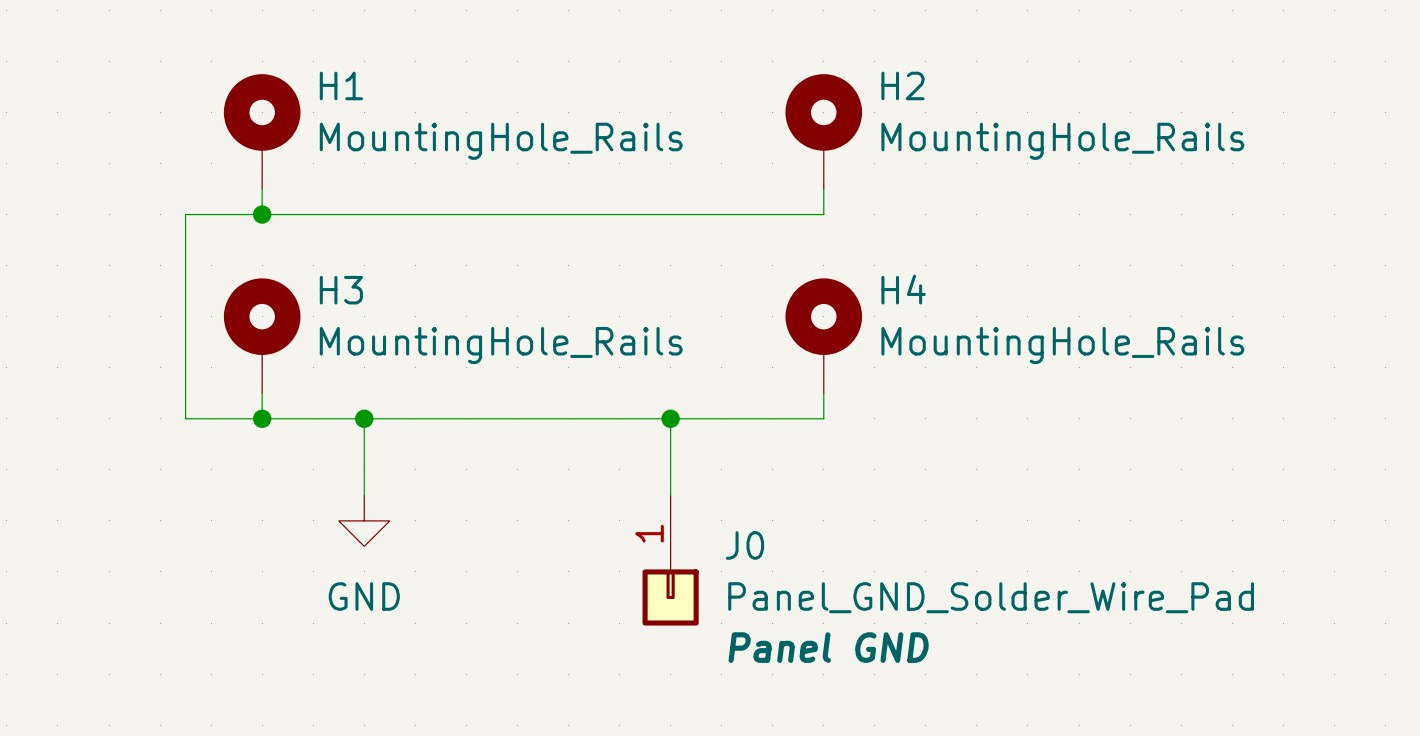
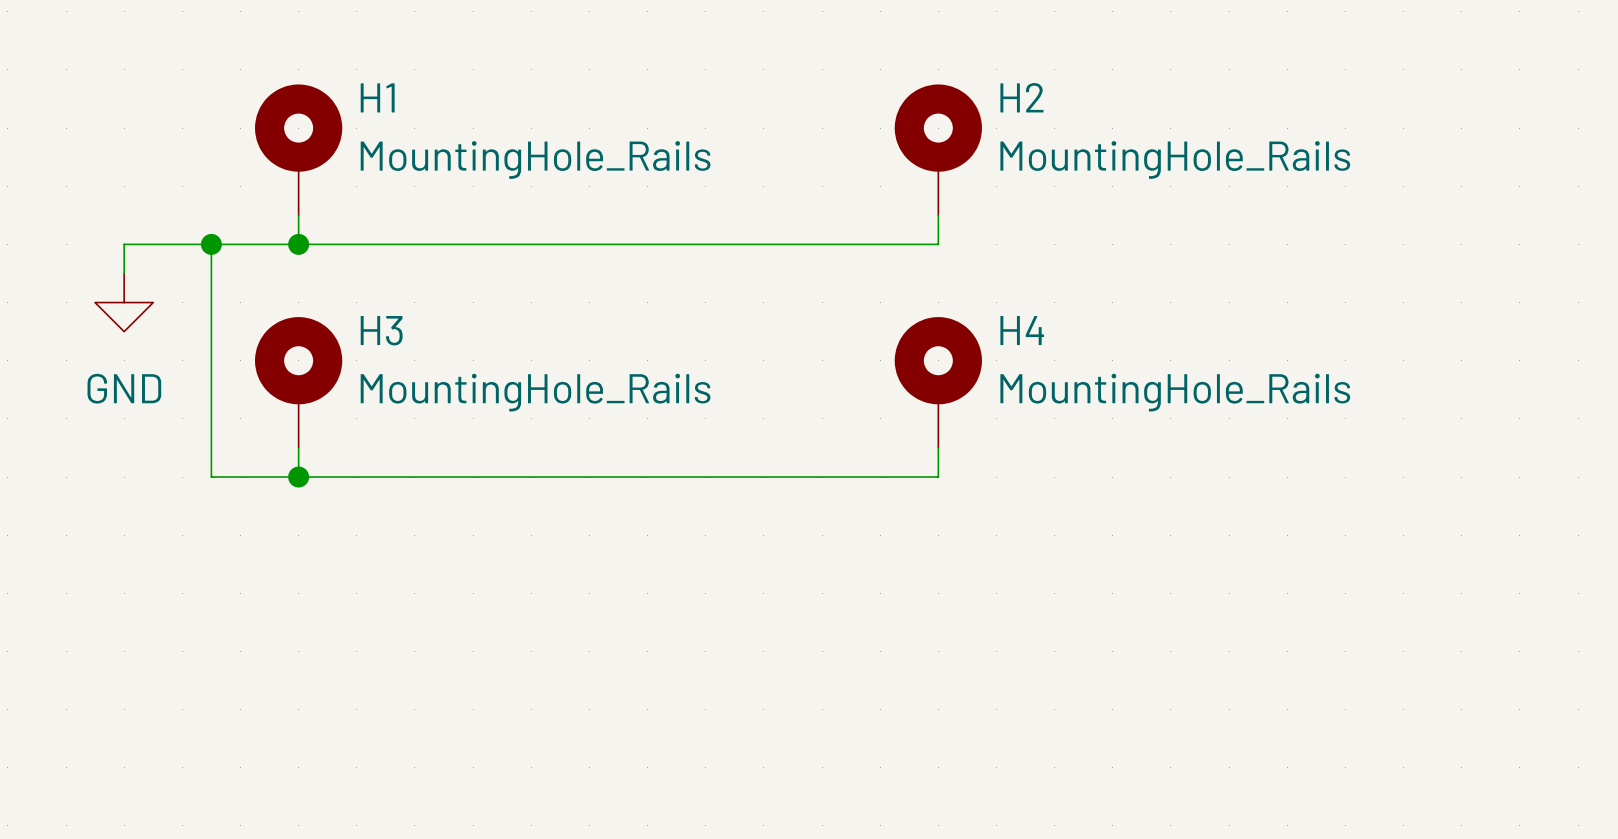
wire: none -> (211, 244) (124, 244) (124, 273)
junction: none -> (211, 244)
wire: (364, 418) (364, 495) -> none
junction: (364, 418) -> none
wire: (670, 418) (670, 495) -> none
junction: (670, 418) -> none
power symbol position: GND (364, 520) -> GND (124, 302)
J0: Panel_GND_Solder_Wire_Pad (670, 560) -> none

